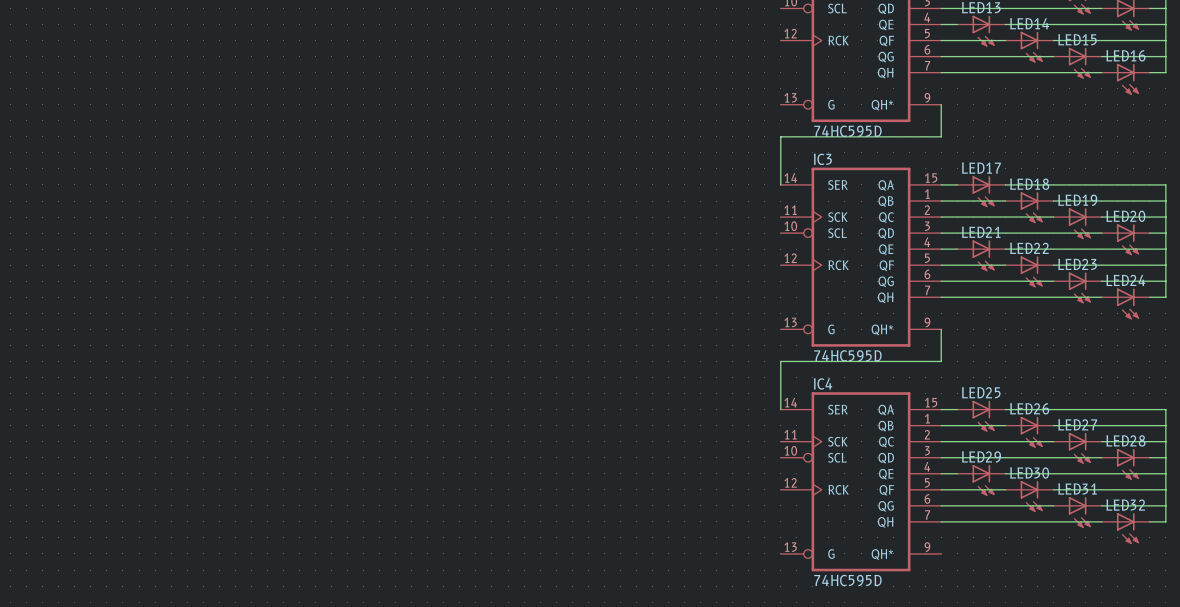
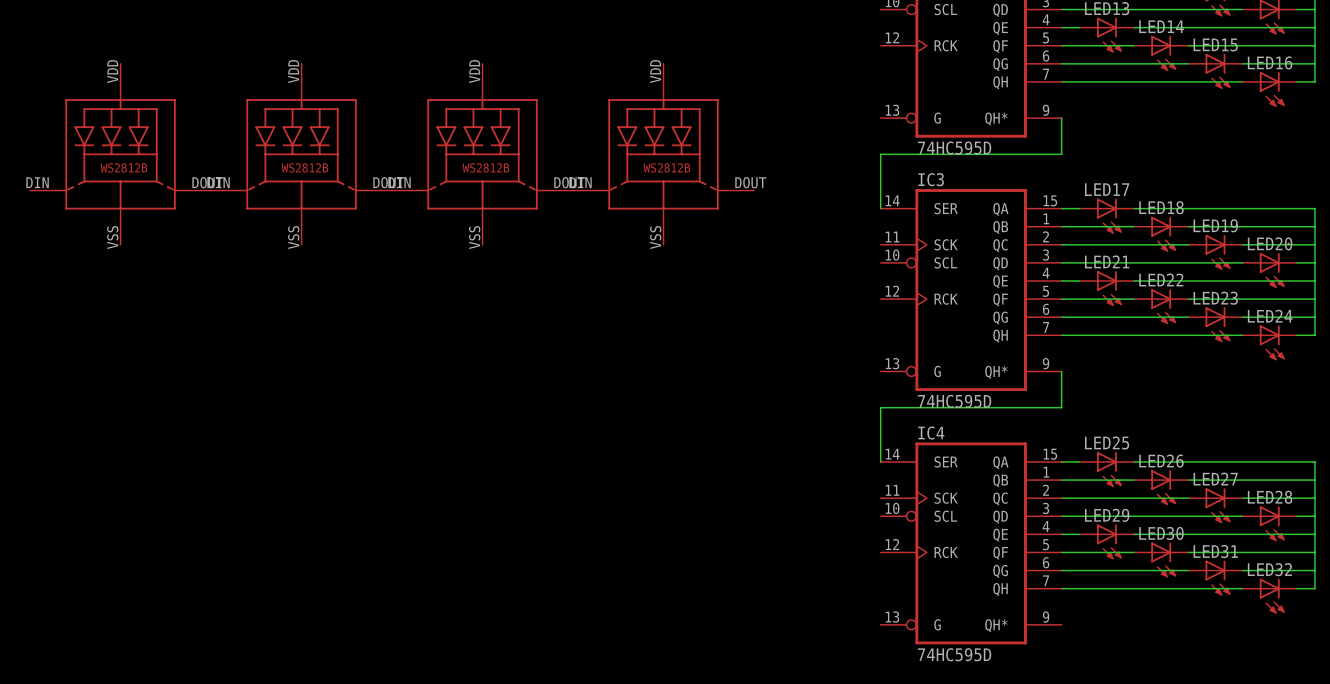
part: none -> (120, 154)
part: none -> (301, 154)
part: none -> (482, 154)
part: none -> (663, 154)

